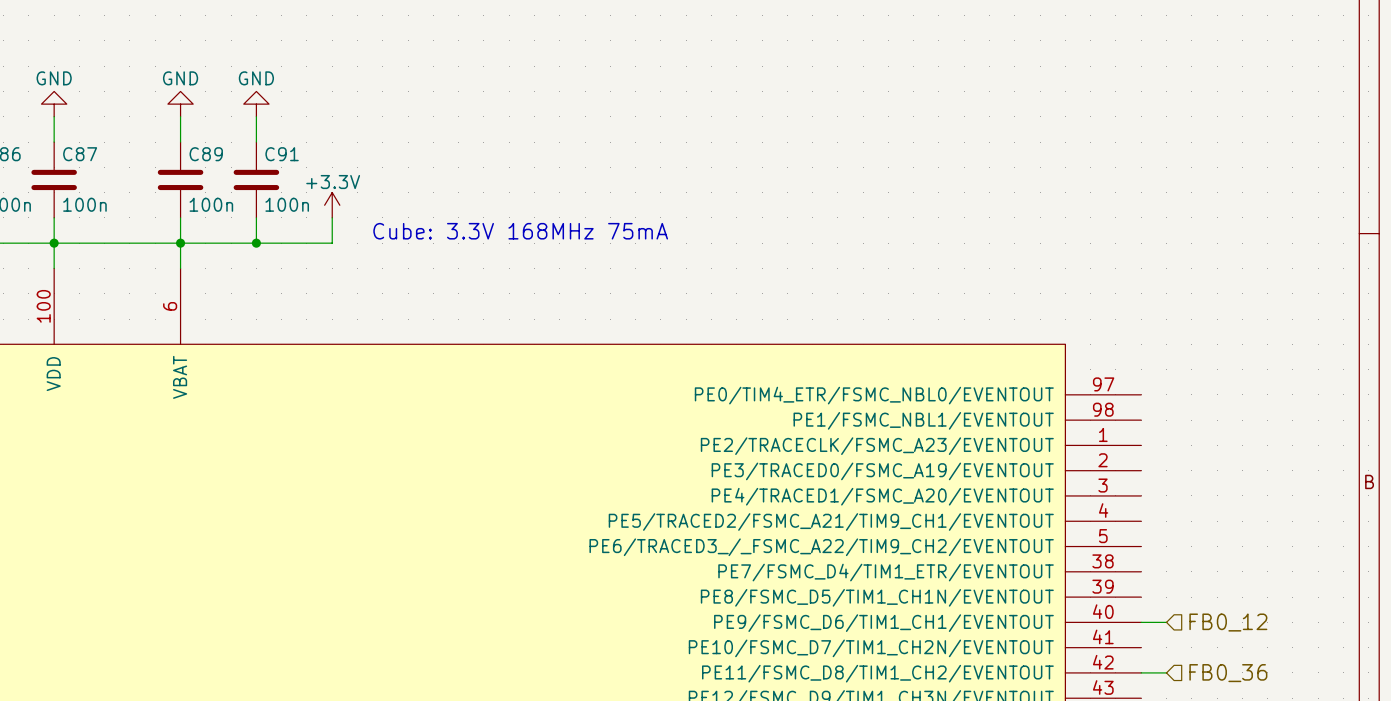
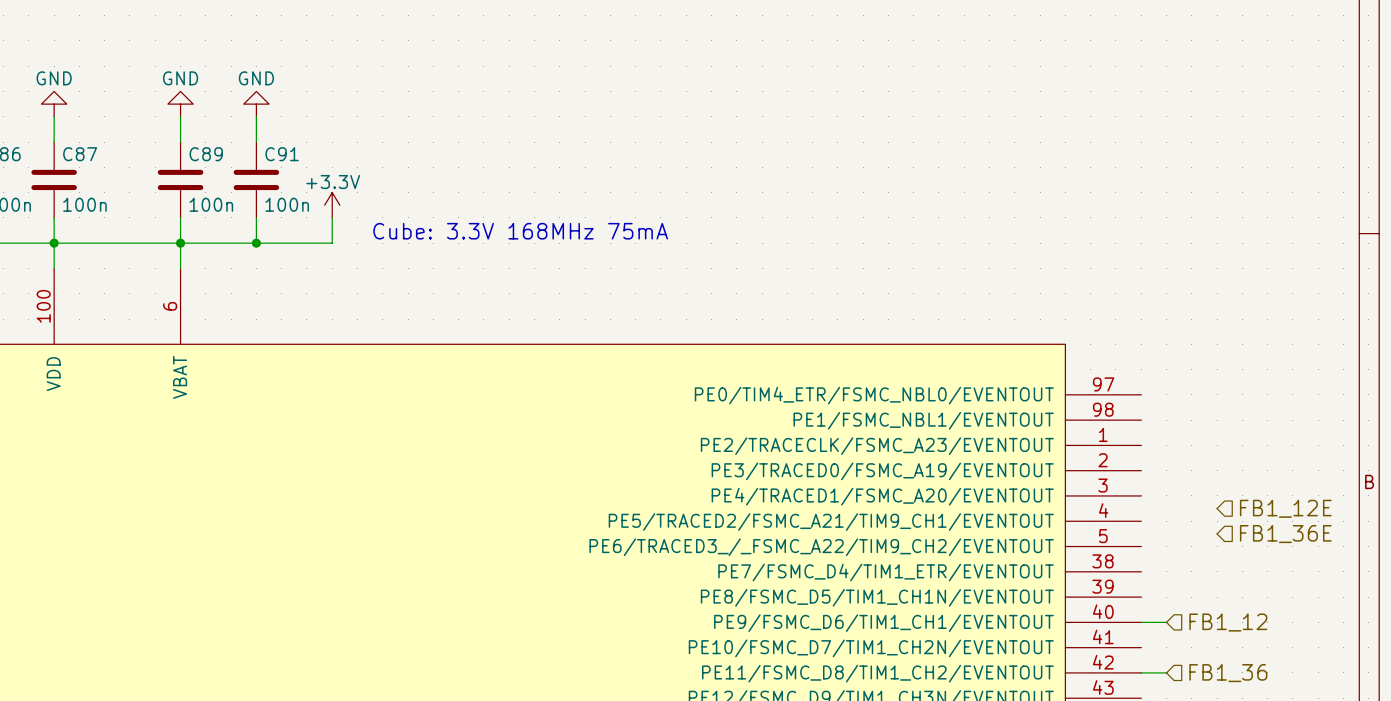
hierarchical label: none -> FB1_12E (1285, 508)
hierarchical label: none -> FB1_36E (1285, 534)
hierarchical label: FB0_12 (1228, 622) -> FB1_12 (1228, 622)
hierarchical label: FB0_36 (1228, 673) -> FB1_36 (1228, 673)

